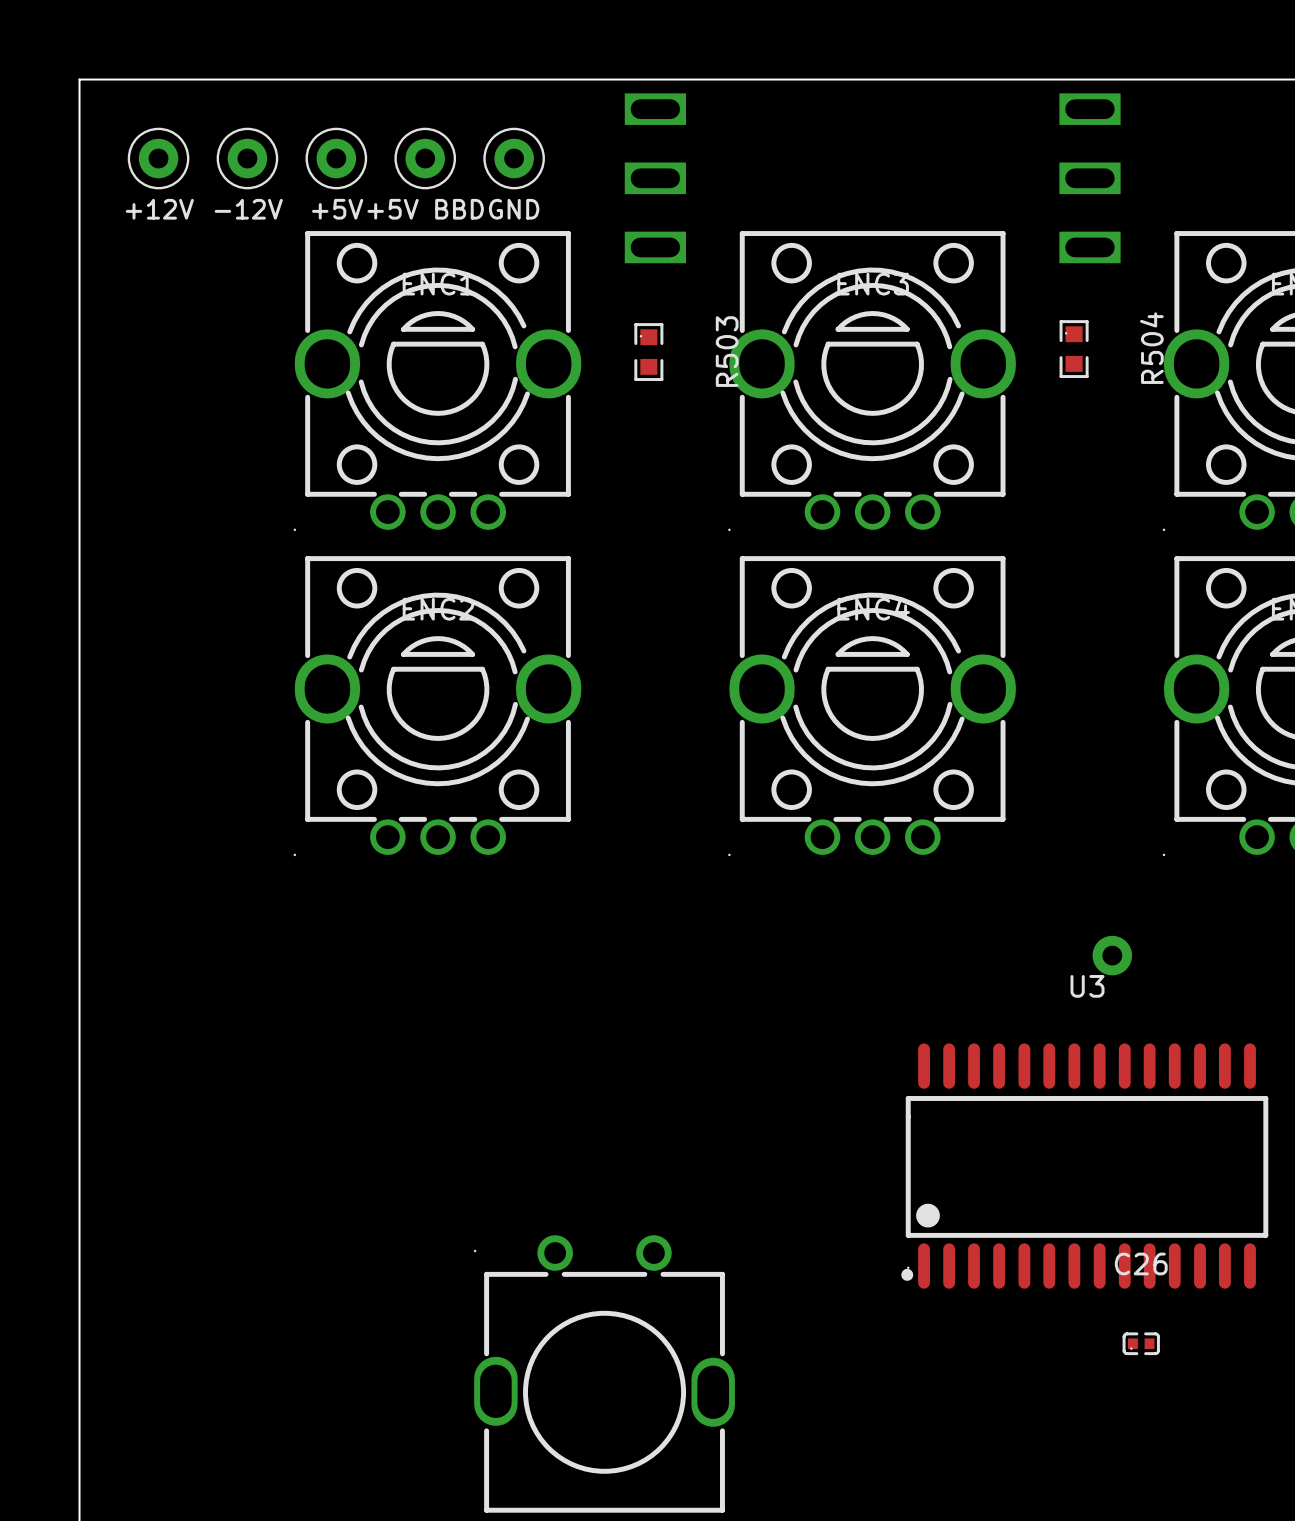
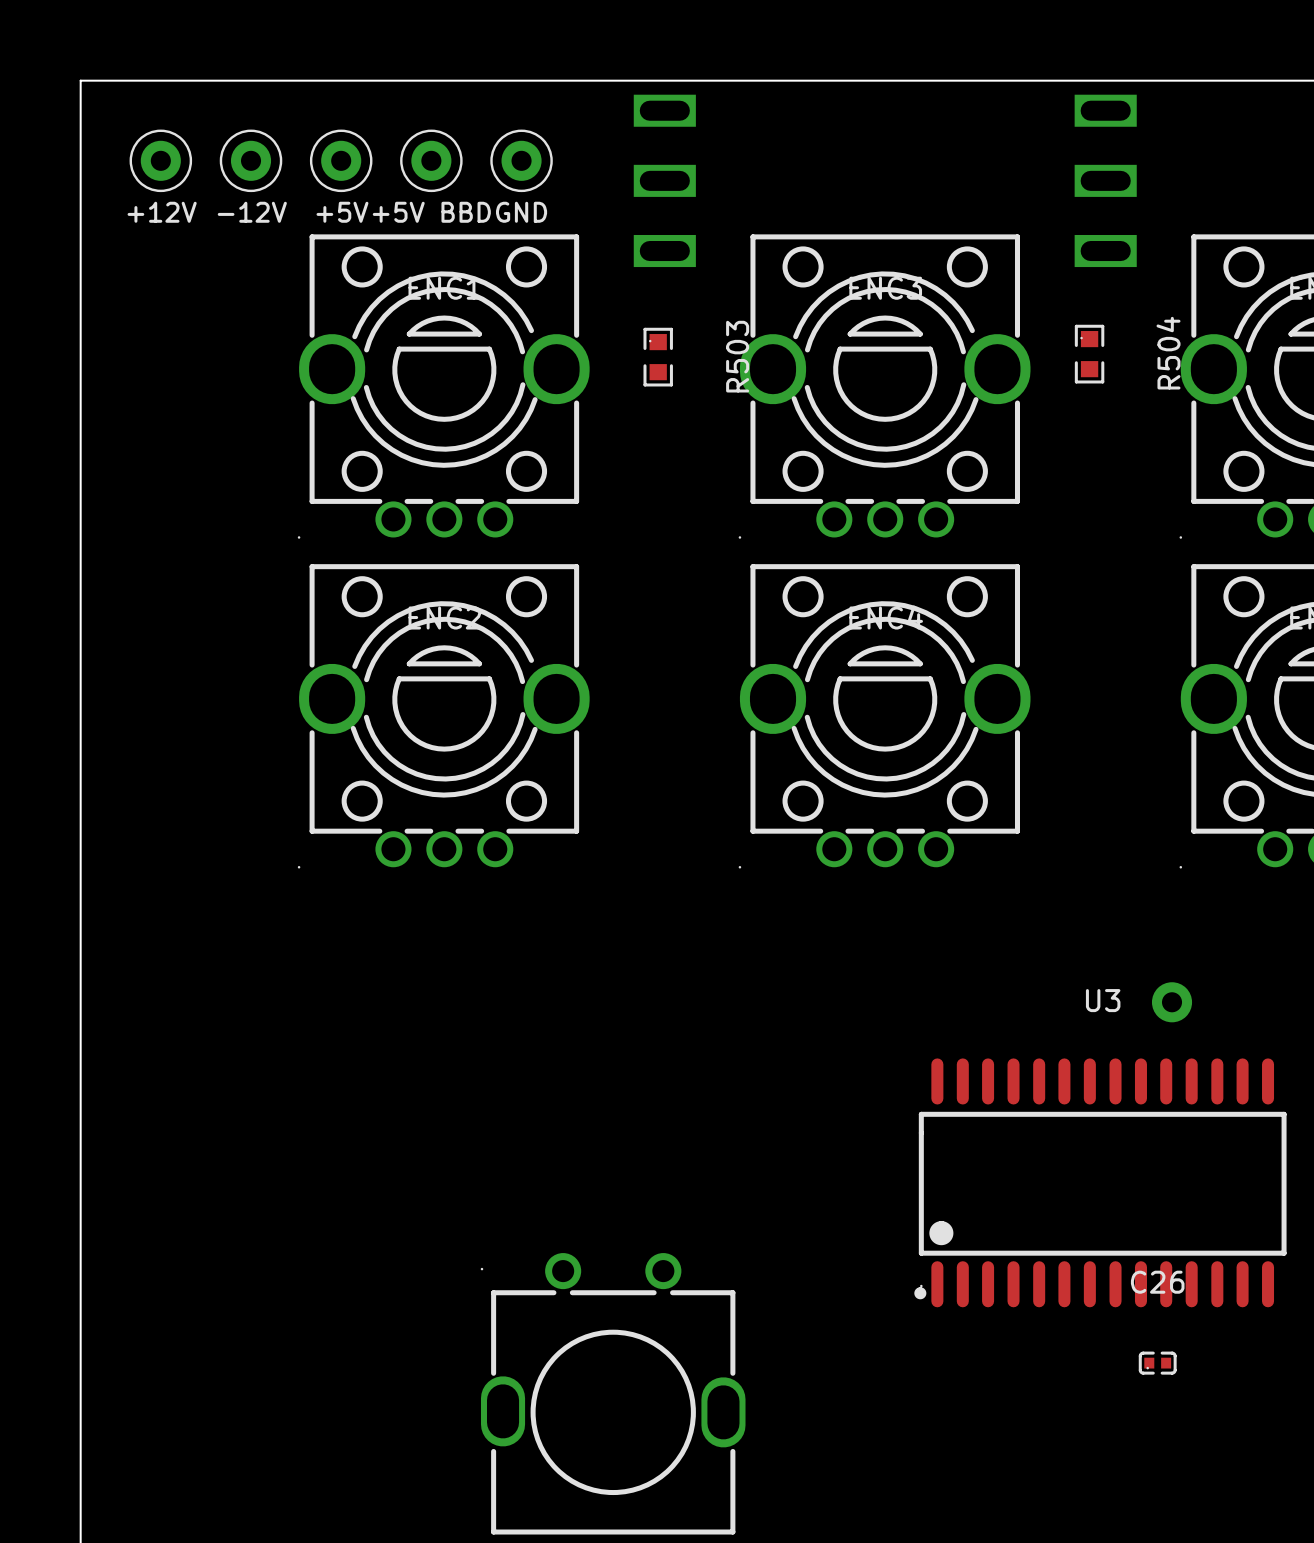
part position: (1112, 955) -> (1172, 1002)

